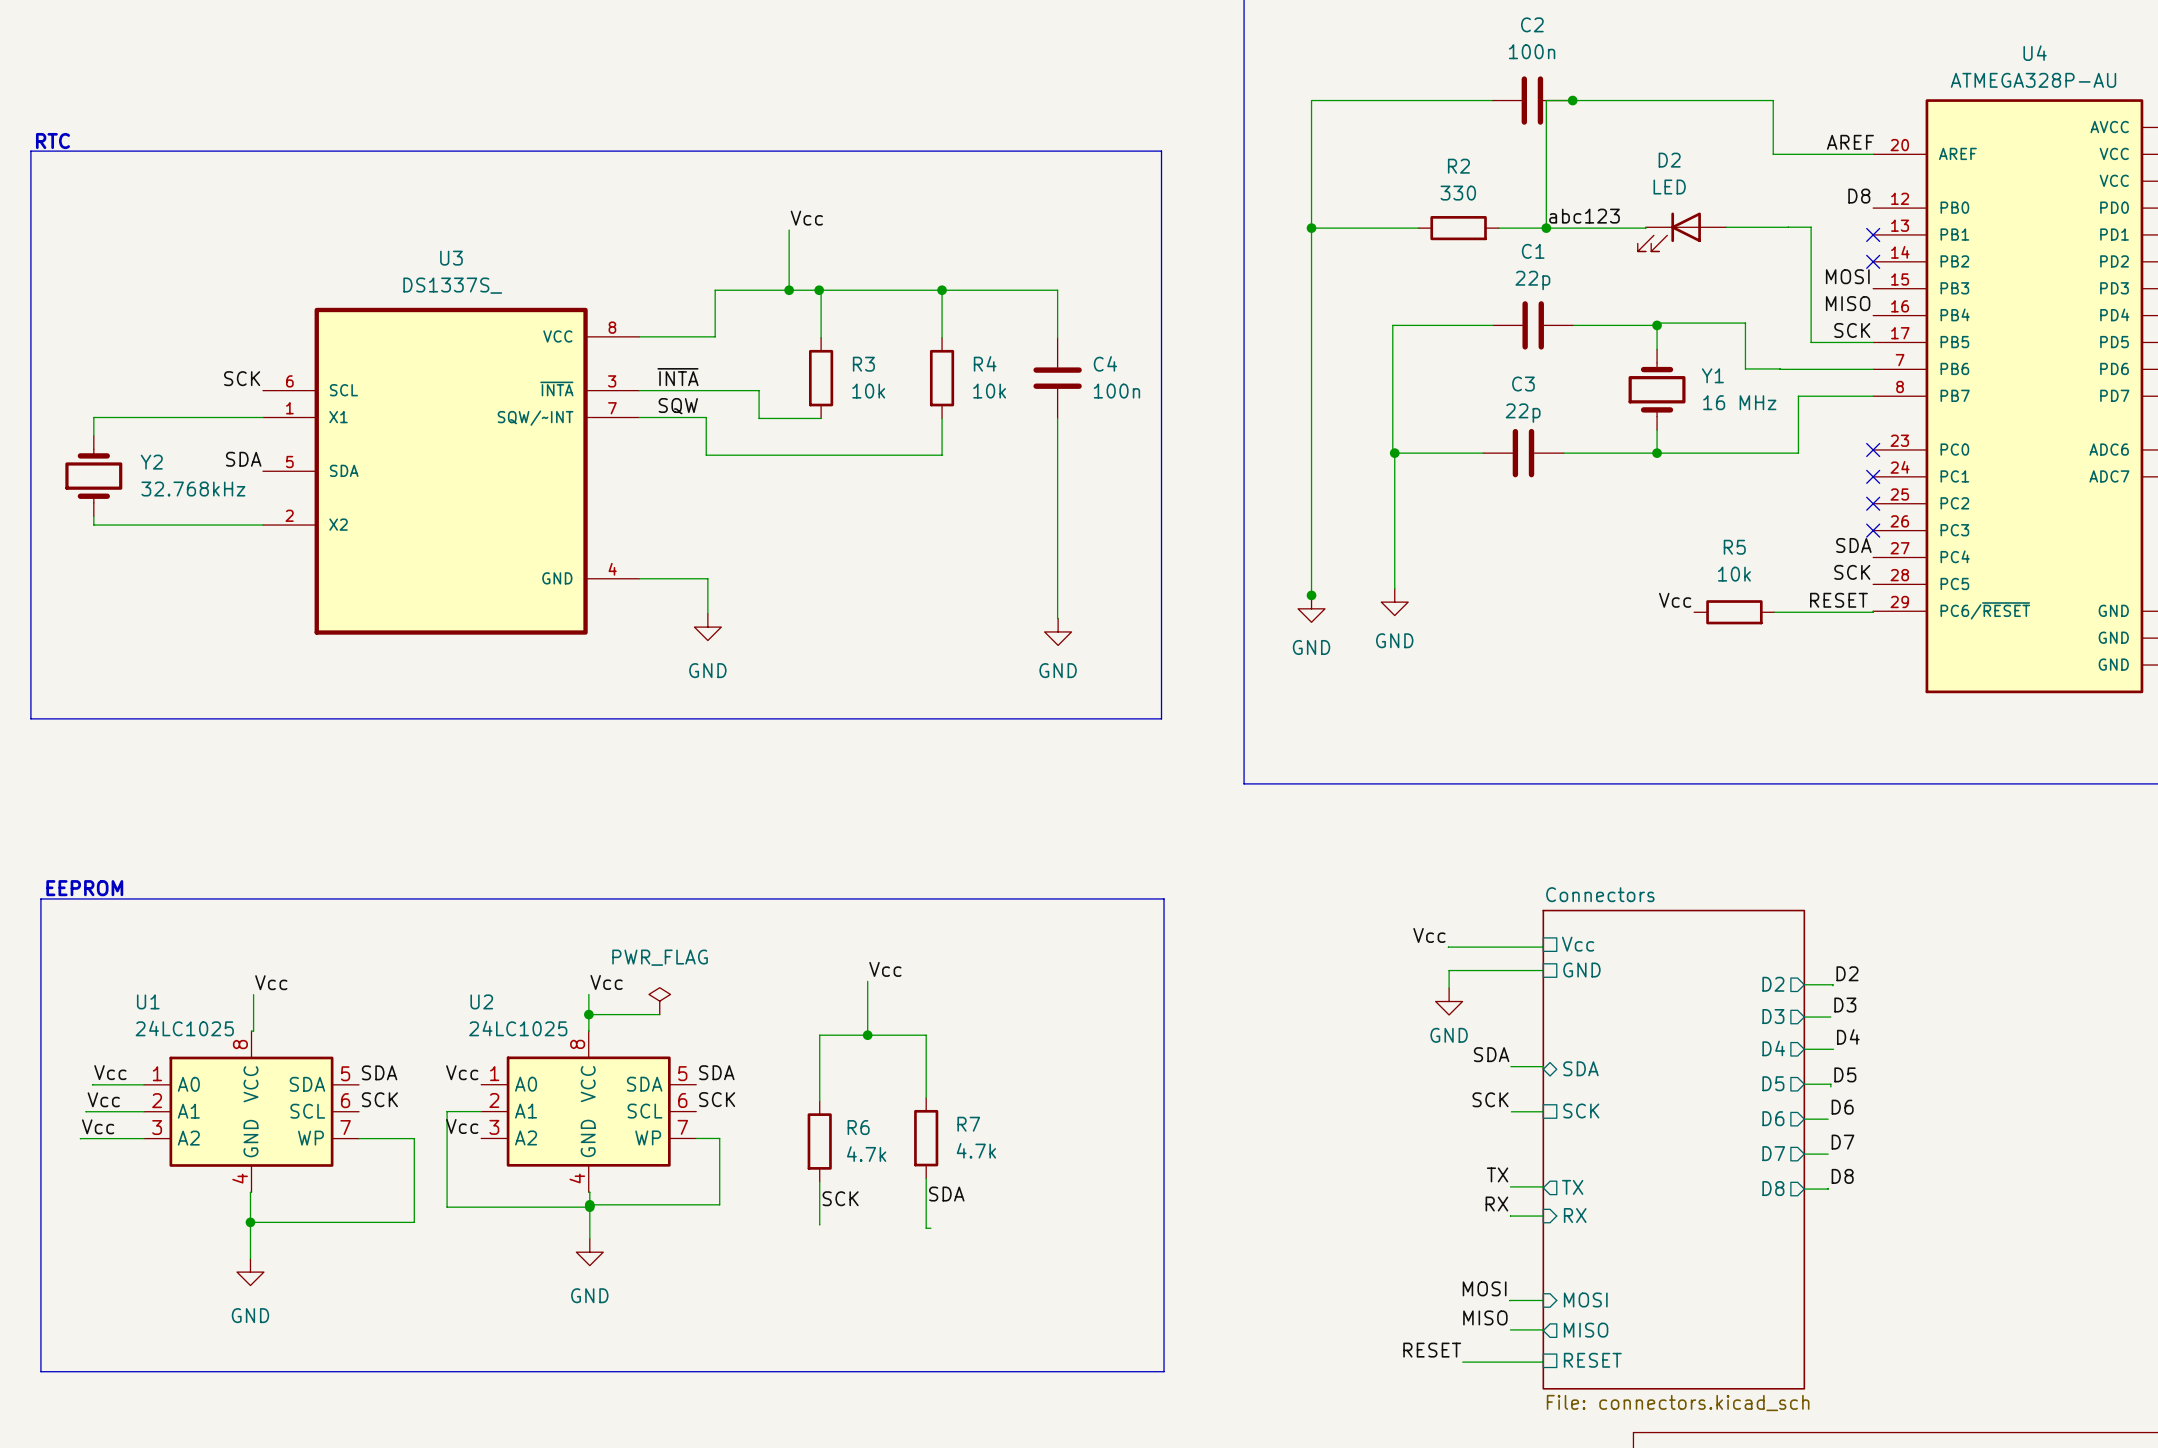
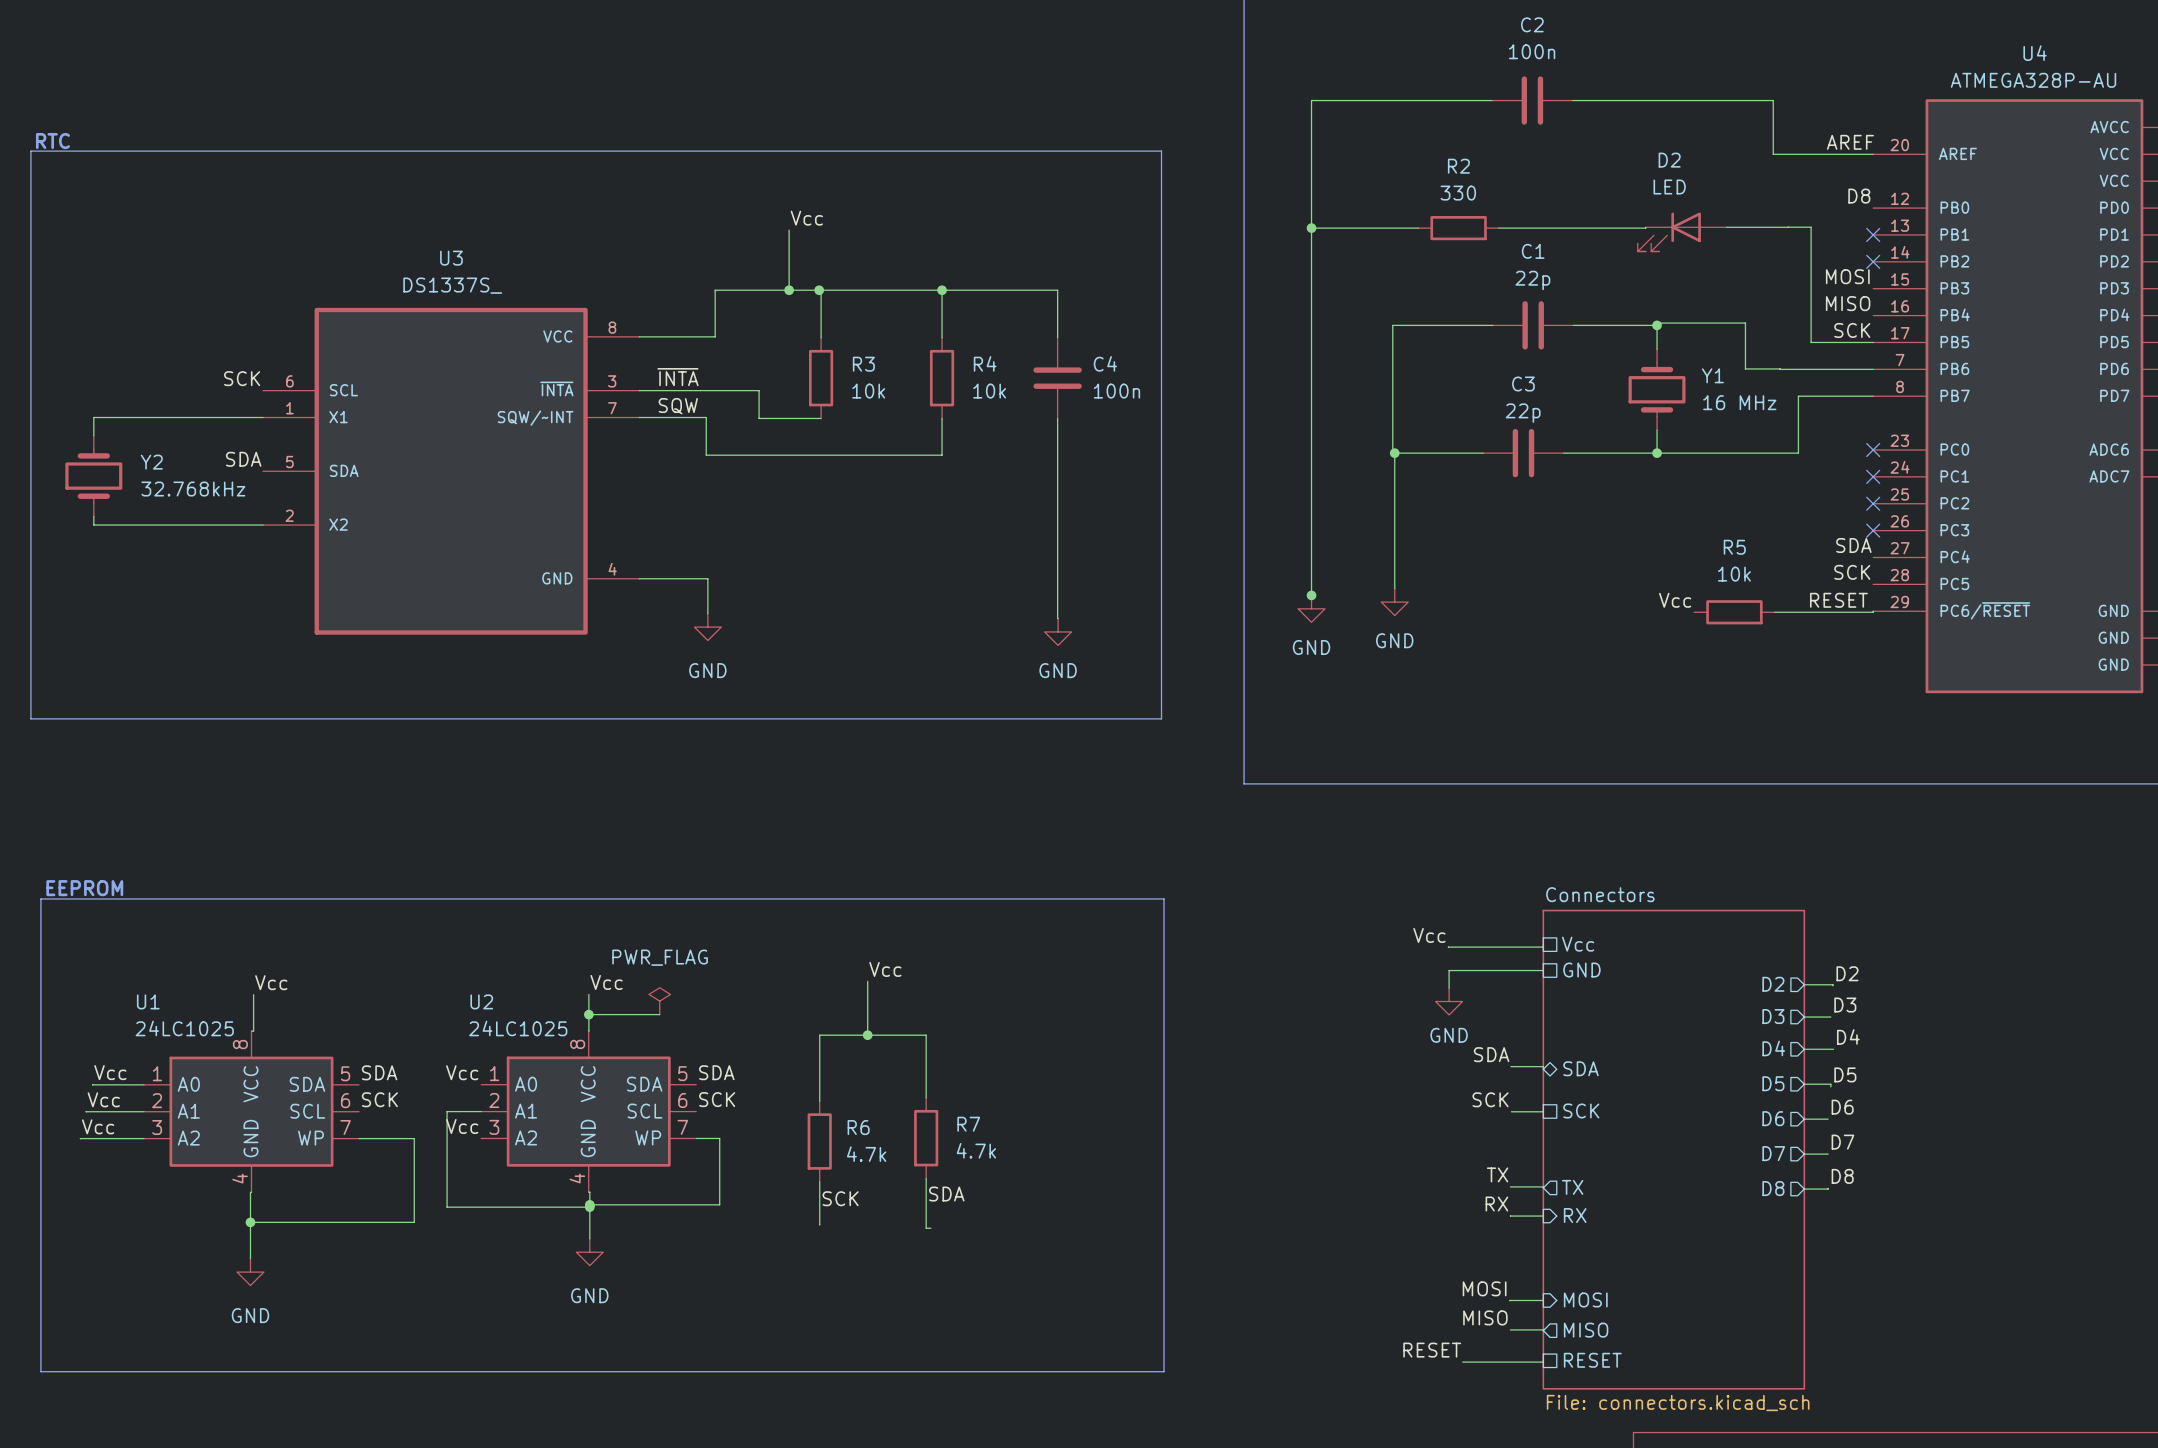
wire: (1572, 100) (1546, 100) (1546, 228) -> none
junction: (1572, 100) -> none
label: abc123 (1584, 216) -> none
junction: (1546, 228) -> none

